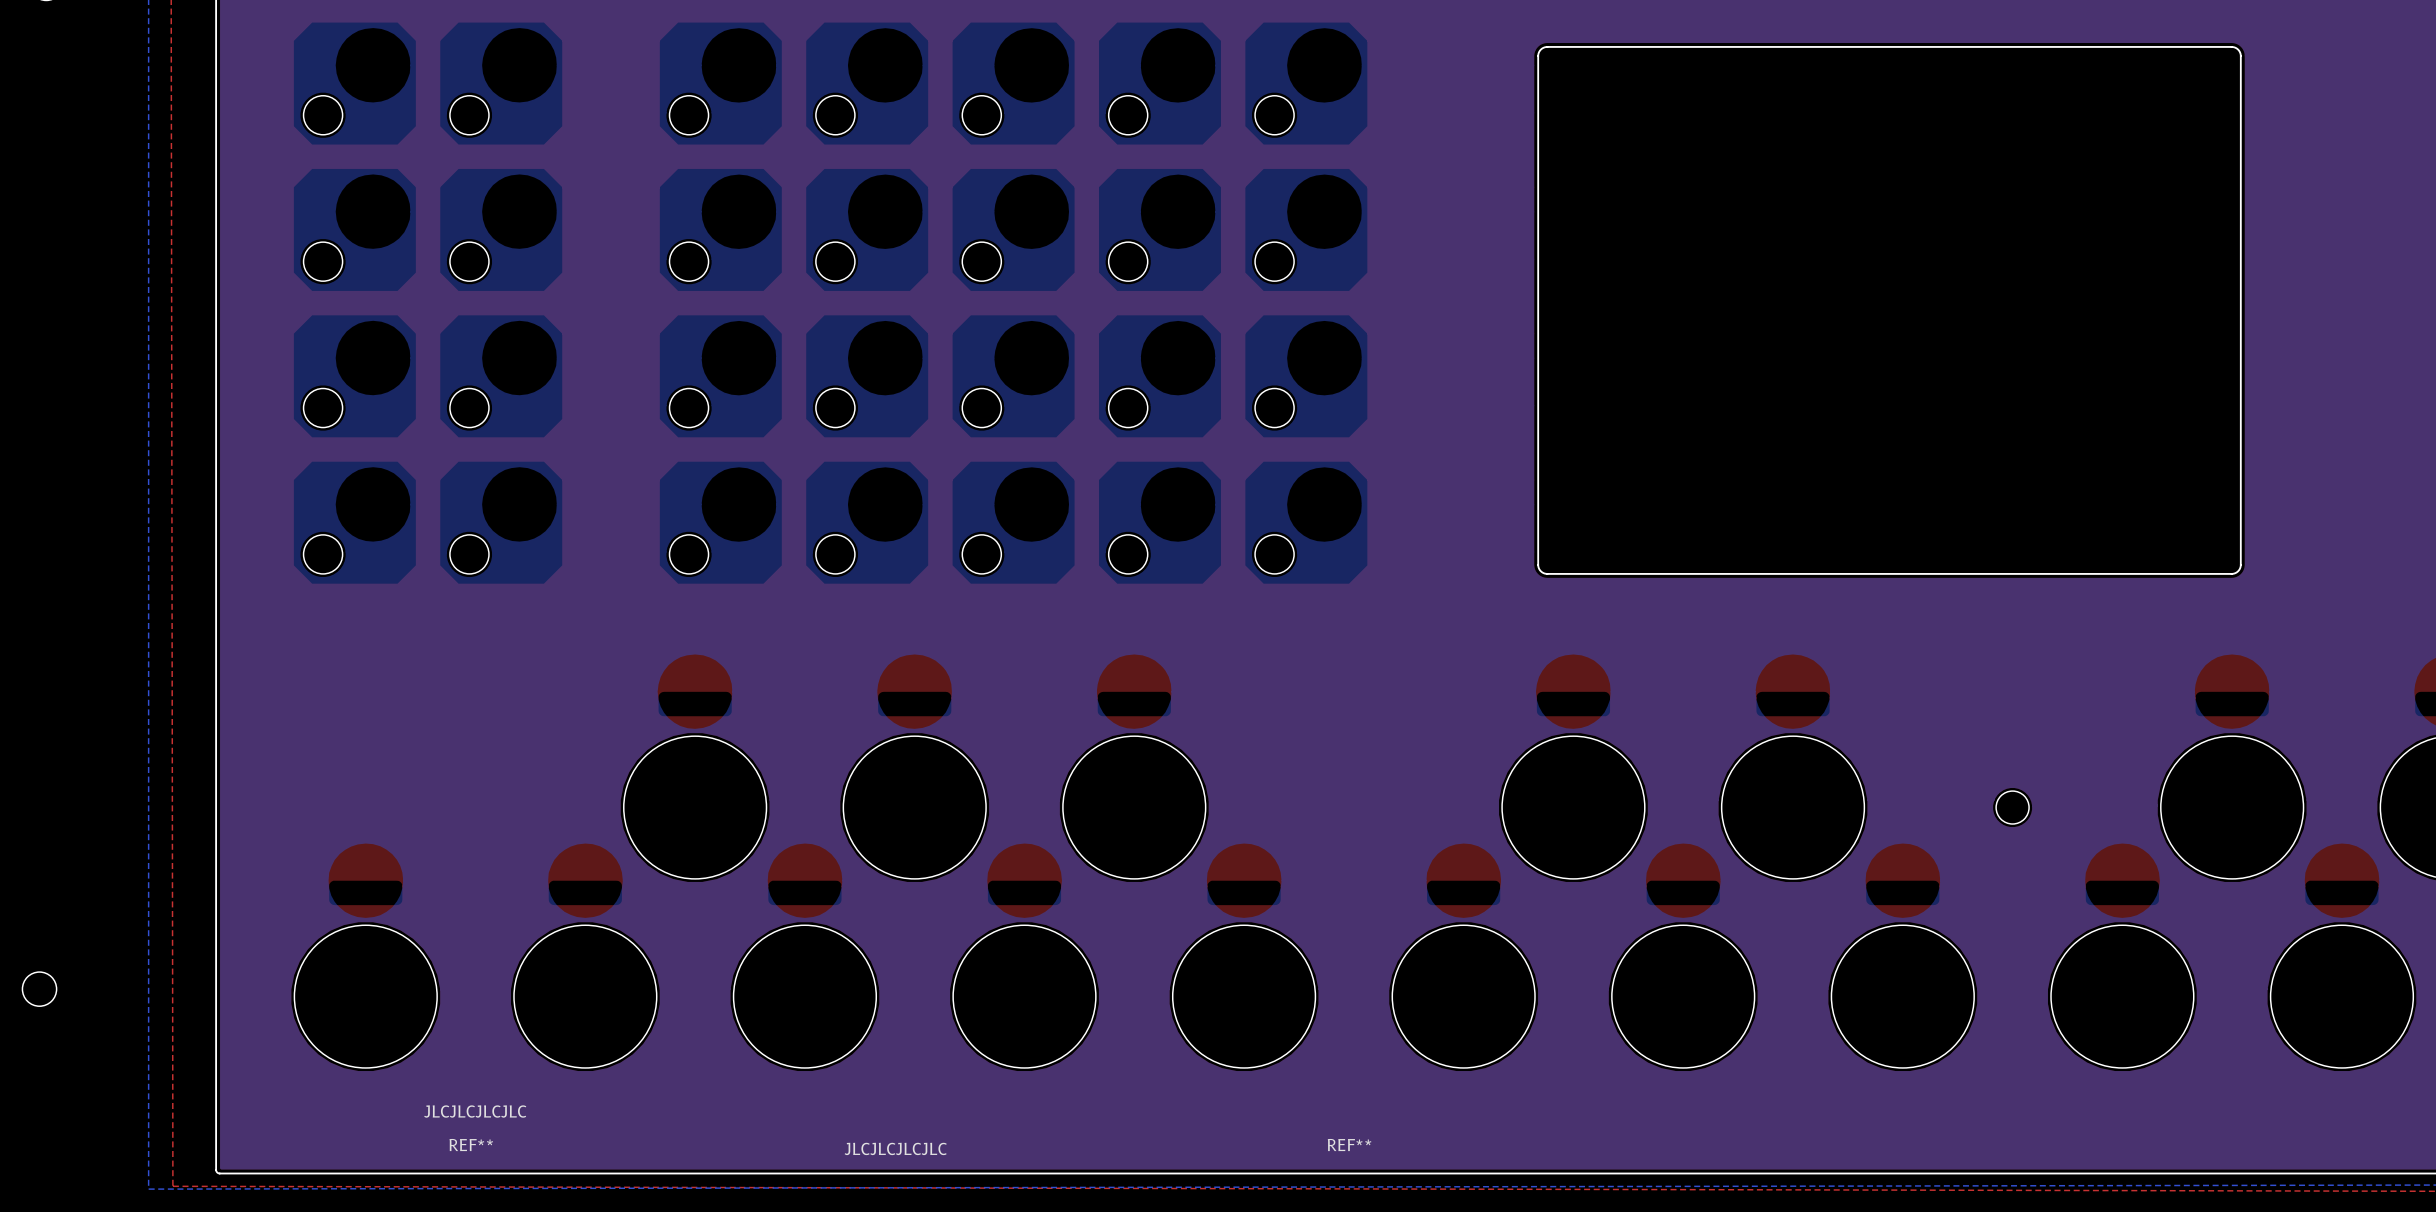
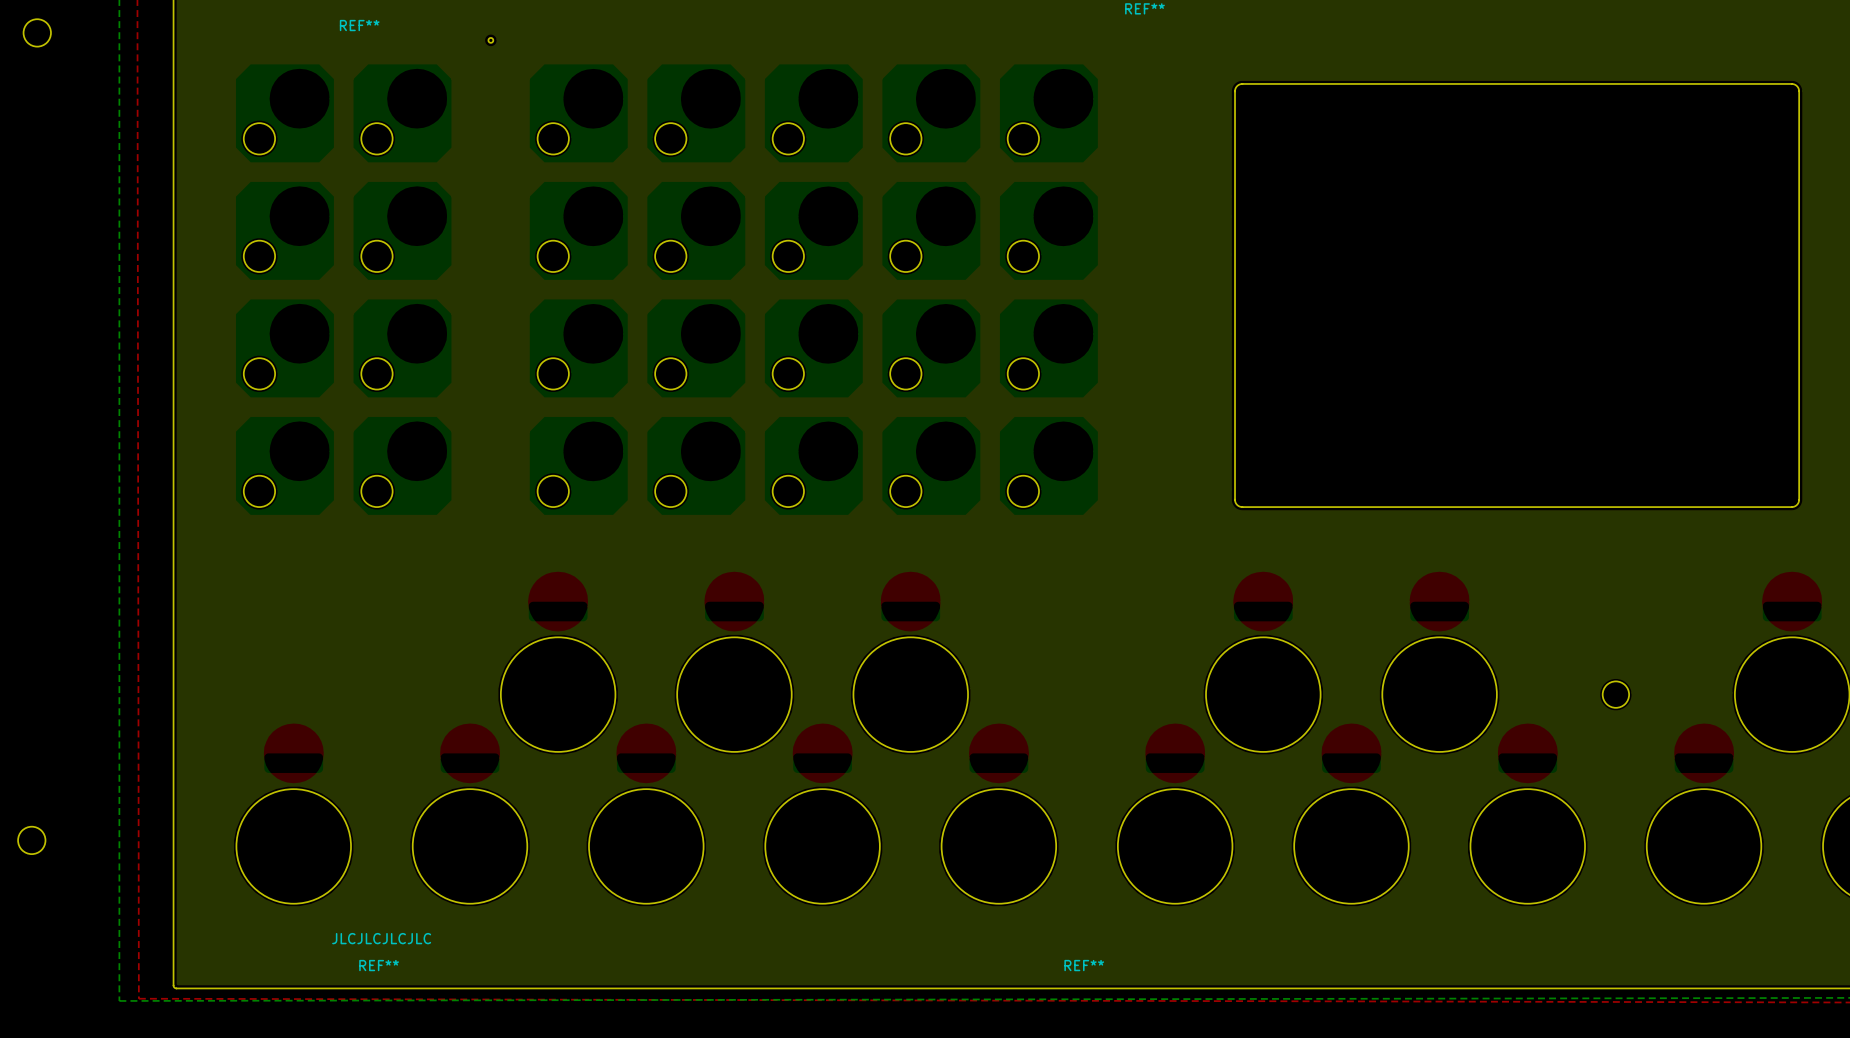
text: JLCJLCJLCJLC (895, 1148) -> none

